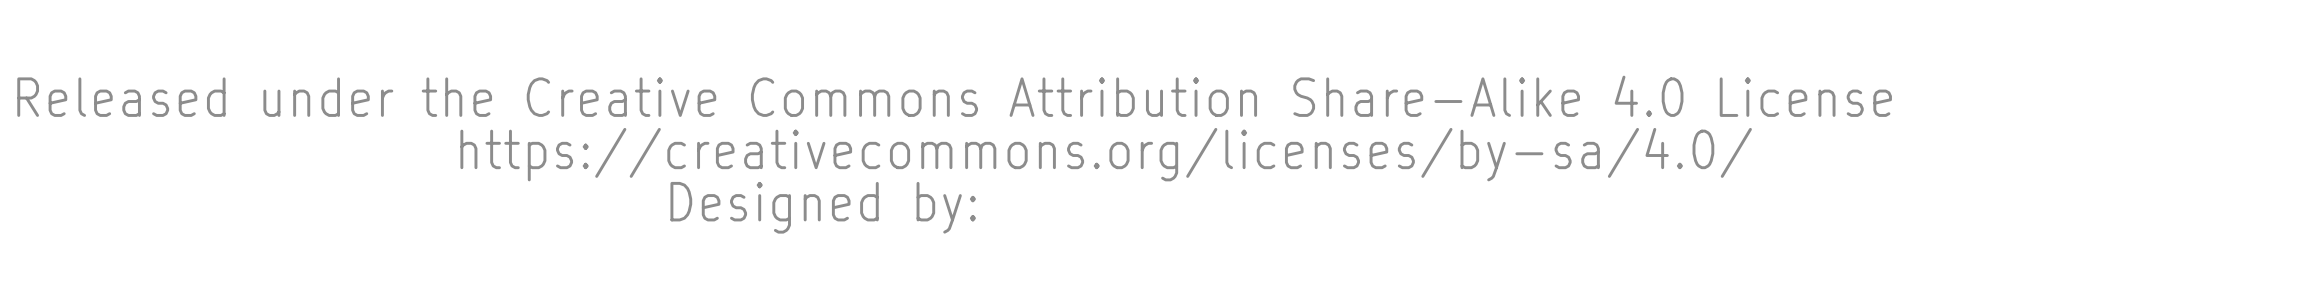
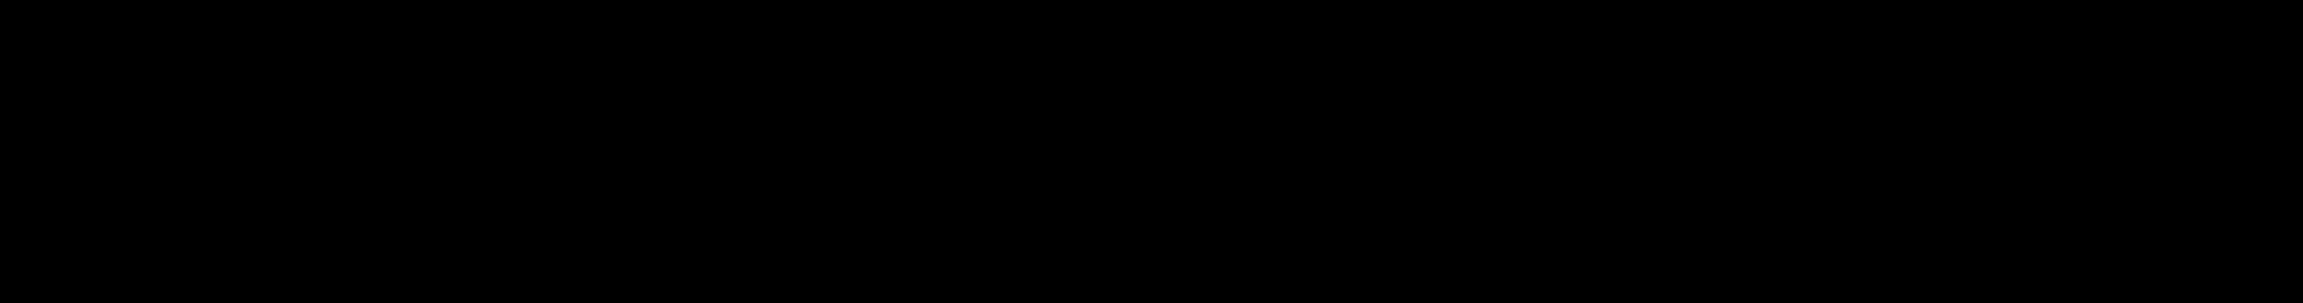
drawing: [17, 75, 1892, 234] -> none

